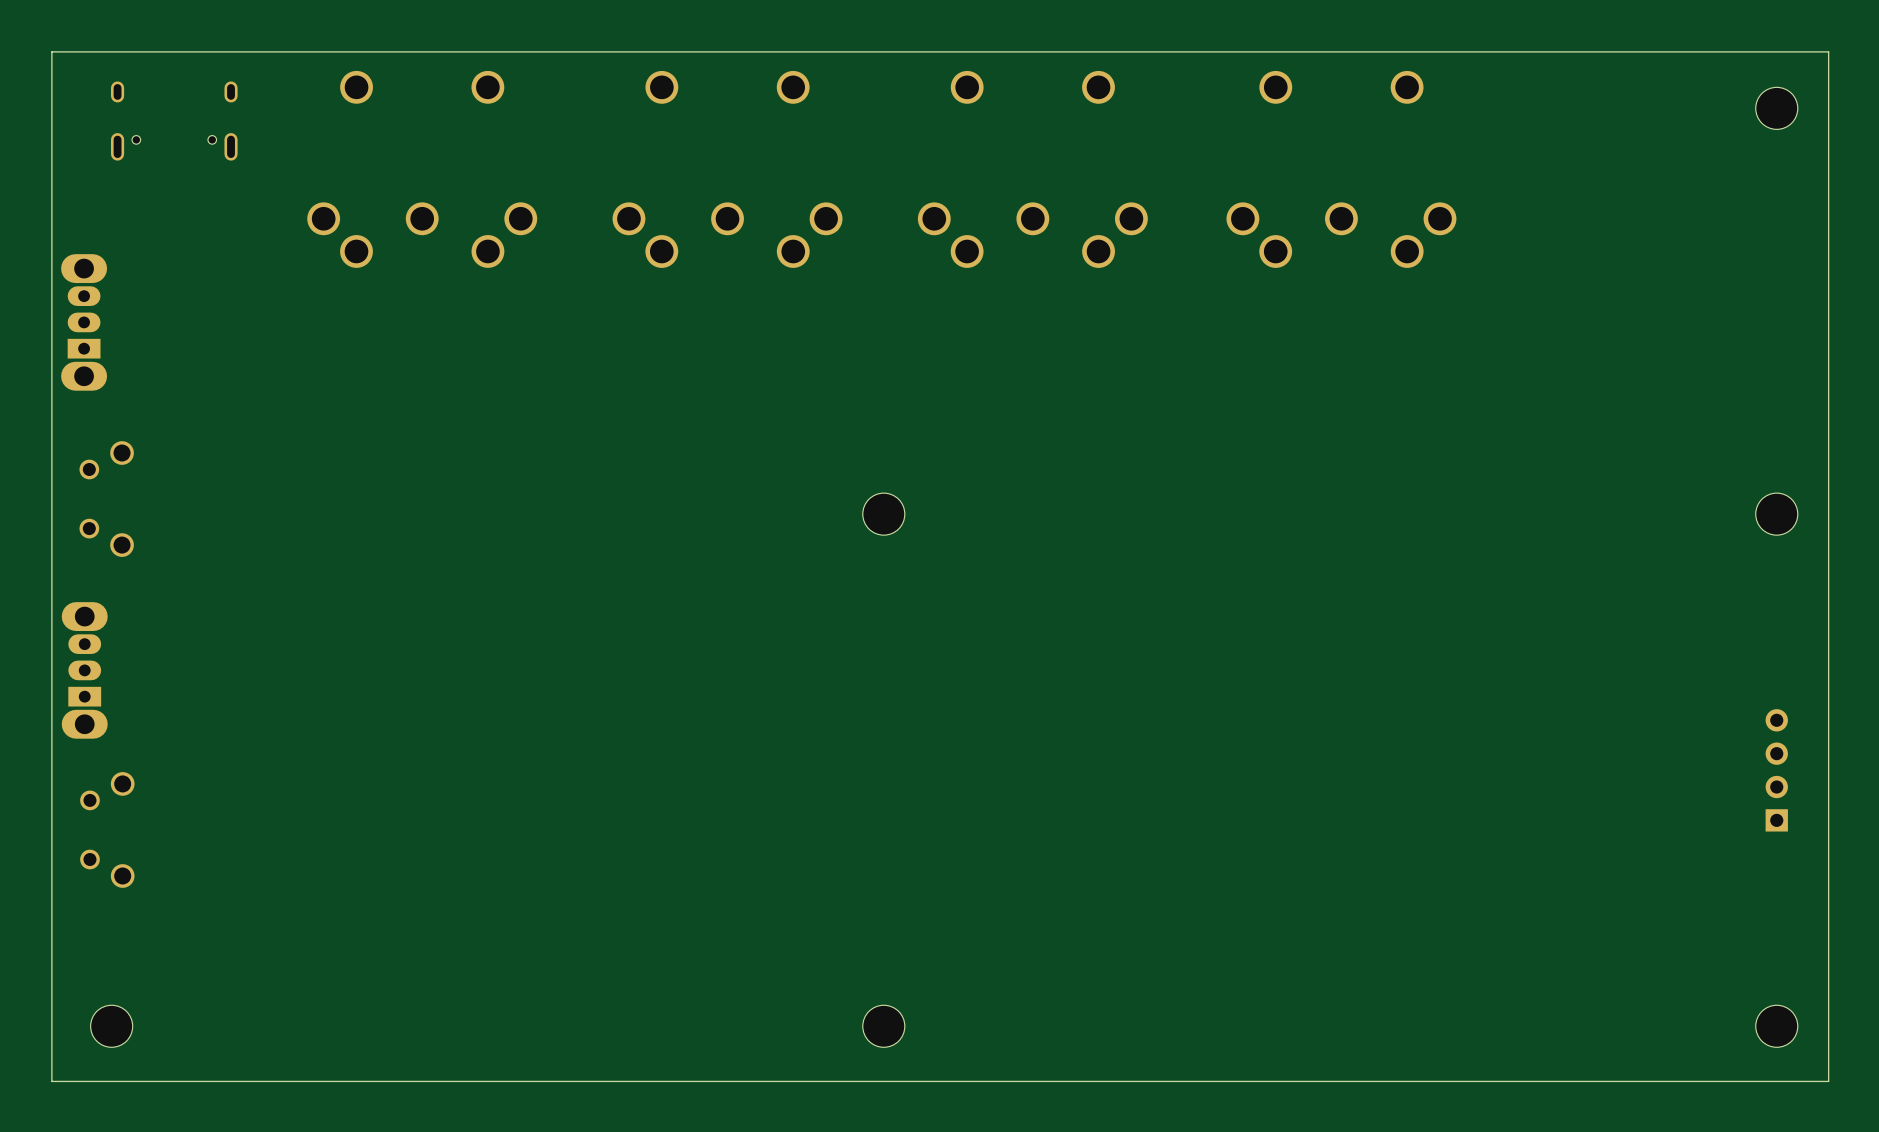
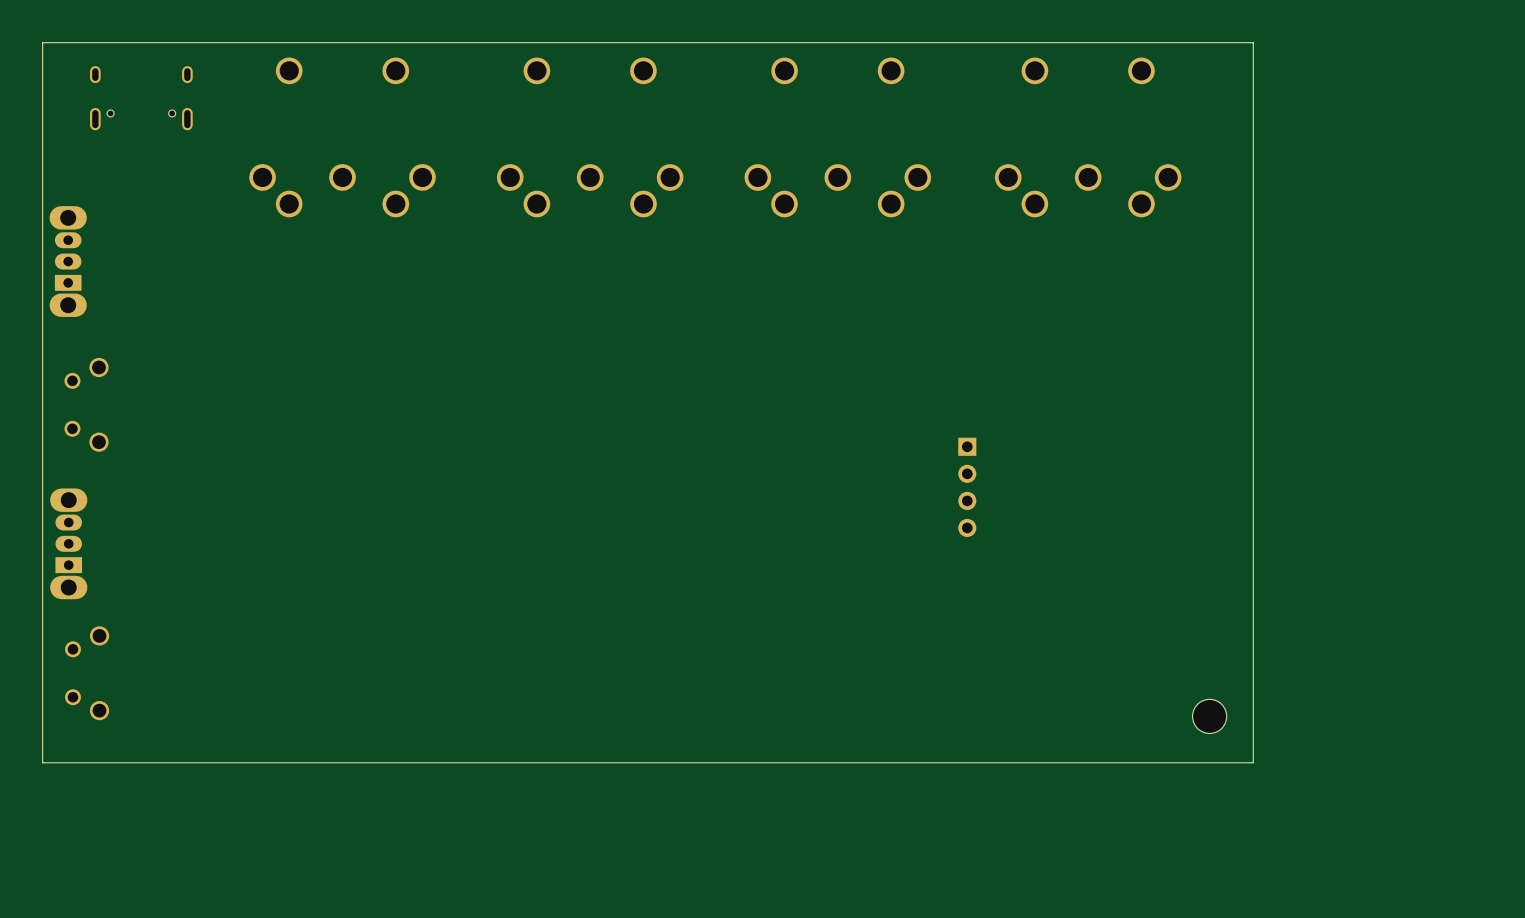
board edge: (1828, 51) (51, 51) (51, 1081) (1828, 1081) (1828, 51) -> (1253, 42) (1253, 762) (42, 762) (42, 42) (1253, 42)
part: (1776, 108) -> none
part: (883, 514) -> none
part: (1776, 514) -> none
part: none -> (967, 487)
part: (1776, 770) -> none
part: none -> (1209, 716)
part: (111, 1026) -> none
part: (883, 1026) -> none
part: (1776, 1026) -> none

